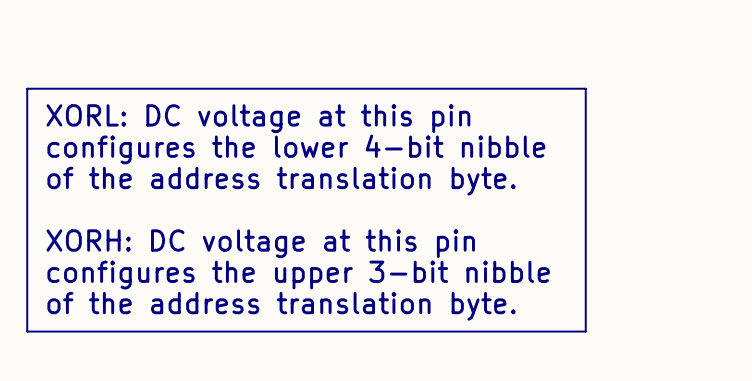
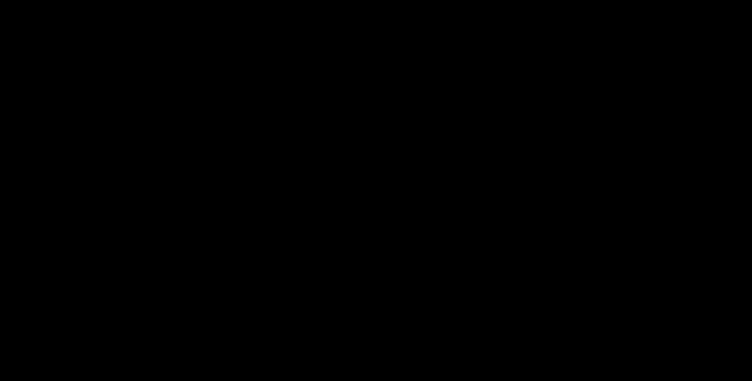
line: (27, 88) (585, 88) (585, 331) (27, 331) (27, 88) -> none
text: XORL: DC voltage at this pin (258, 118) -> none
text: configures the lower 4-bit nibble (296, 149) -> none
text: of the address translation byte. (281, 181) -> none
text: XORH: DC voltage at this pin (260, 243) -> none
text: configures the upper 3-bit nibble (298, 275) -> none
text: of the address translation byte. (281, 306) -> none

